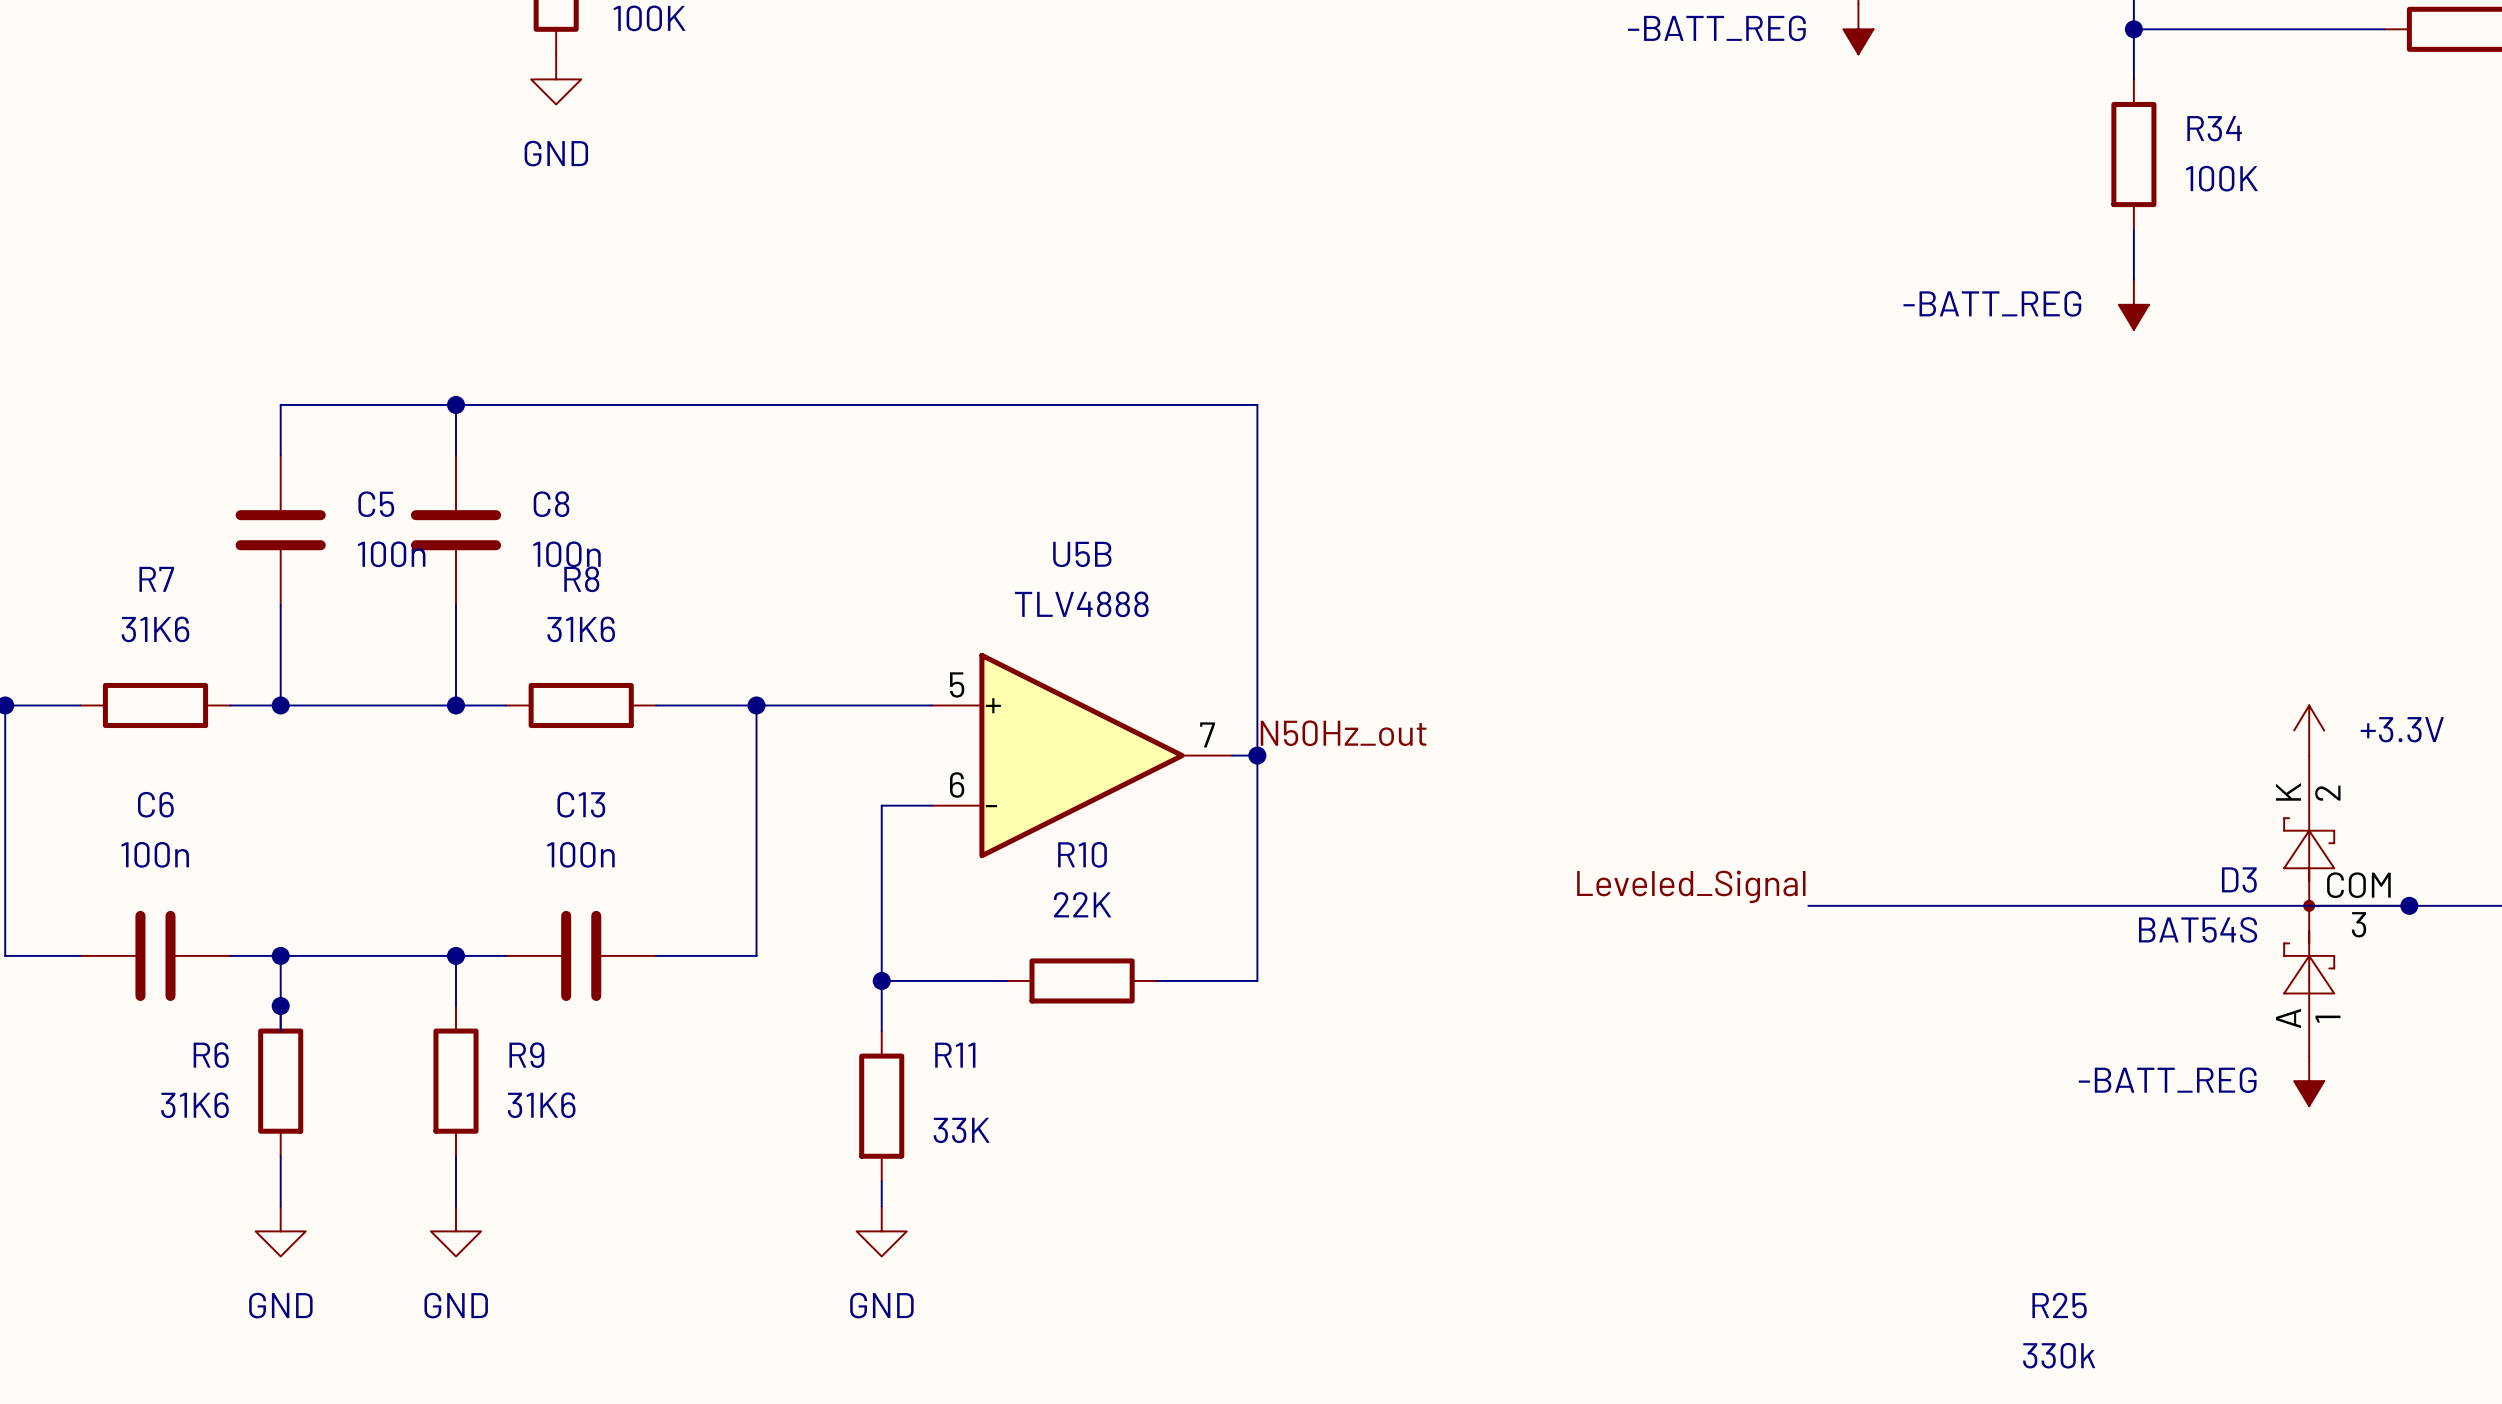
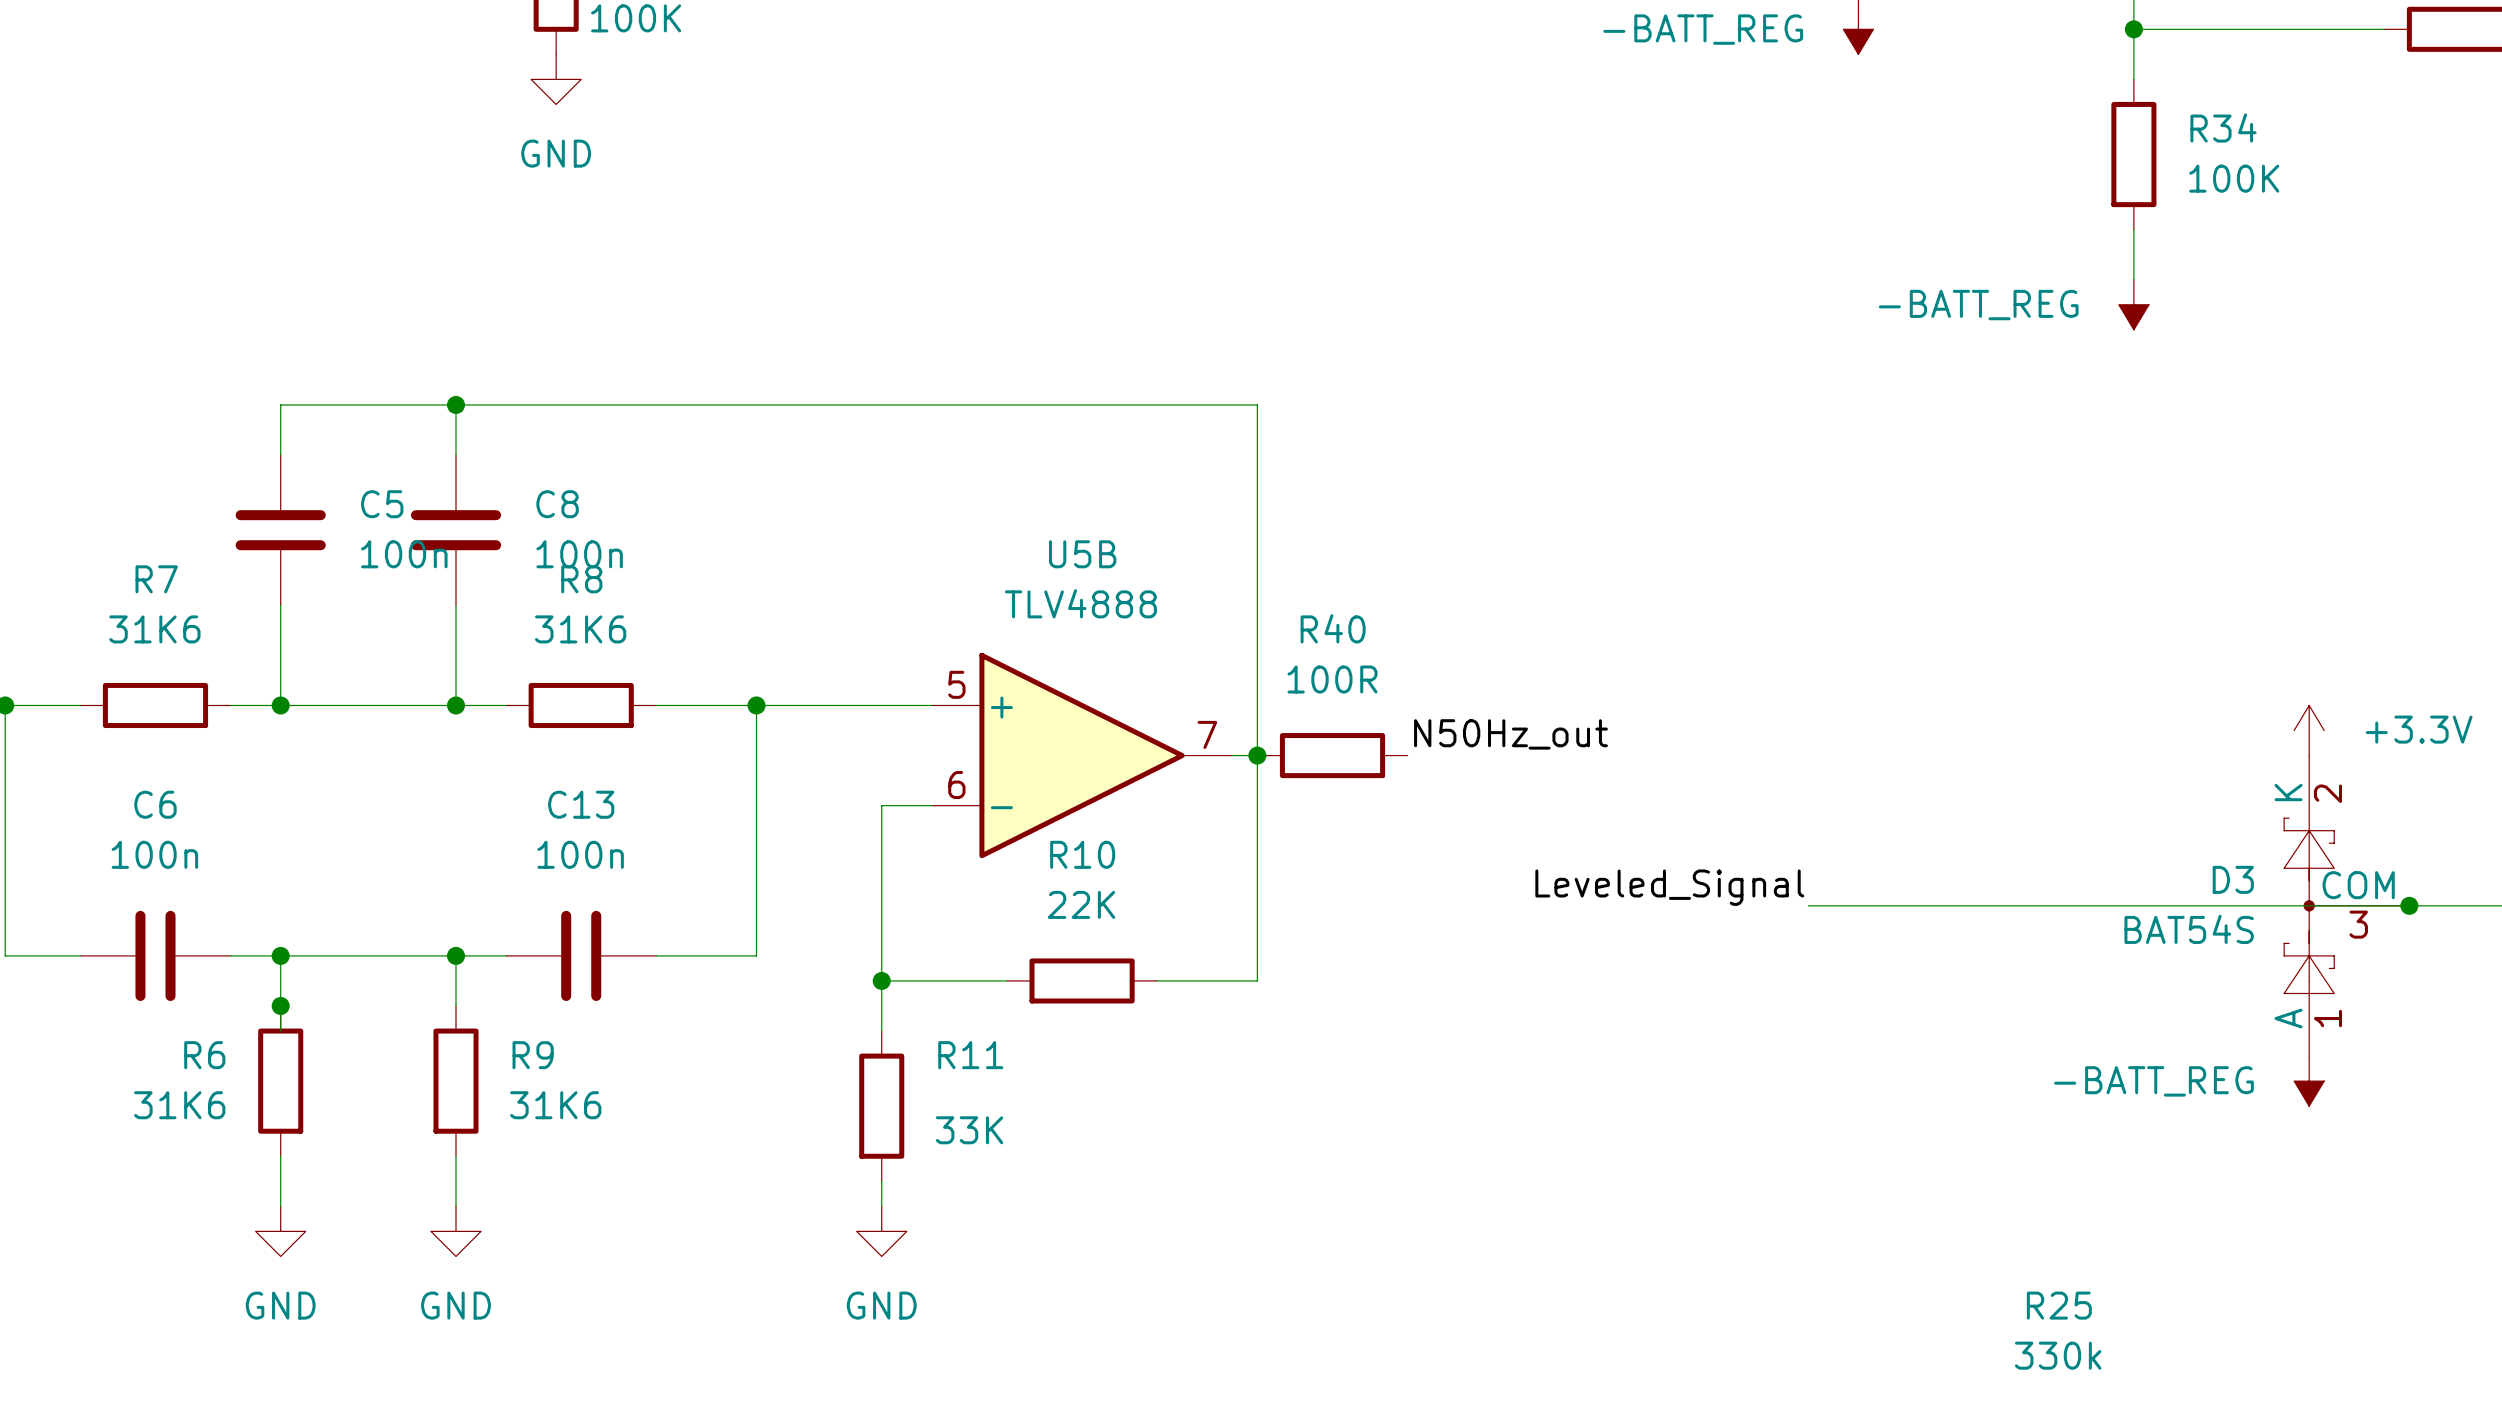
label position: N50Hz_out (1343, 733) -> N50Hz_out (1510, 734)
R40: none -> 100R (1332, 755)

